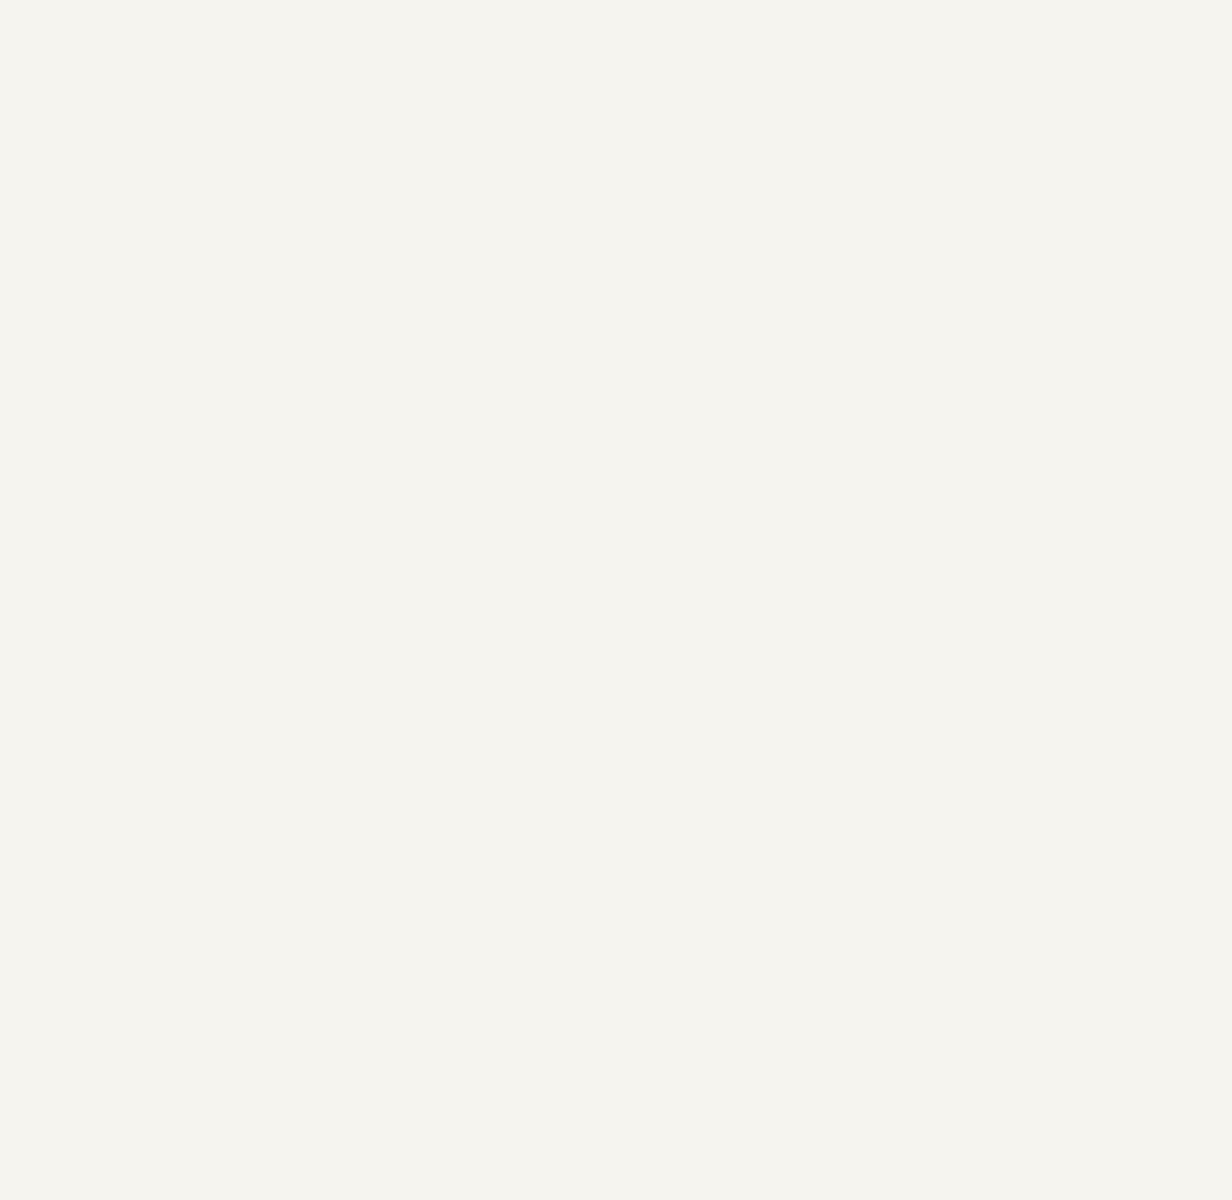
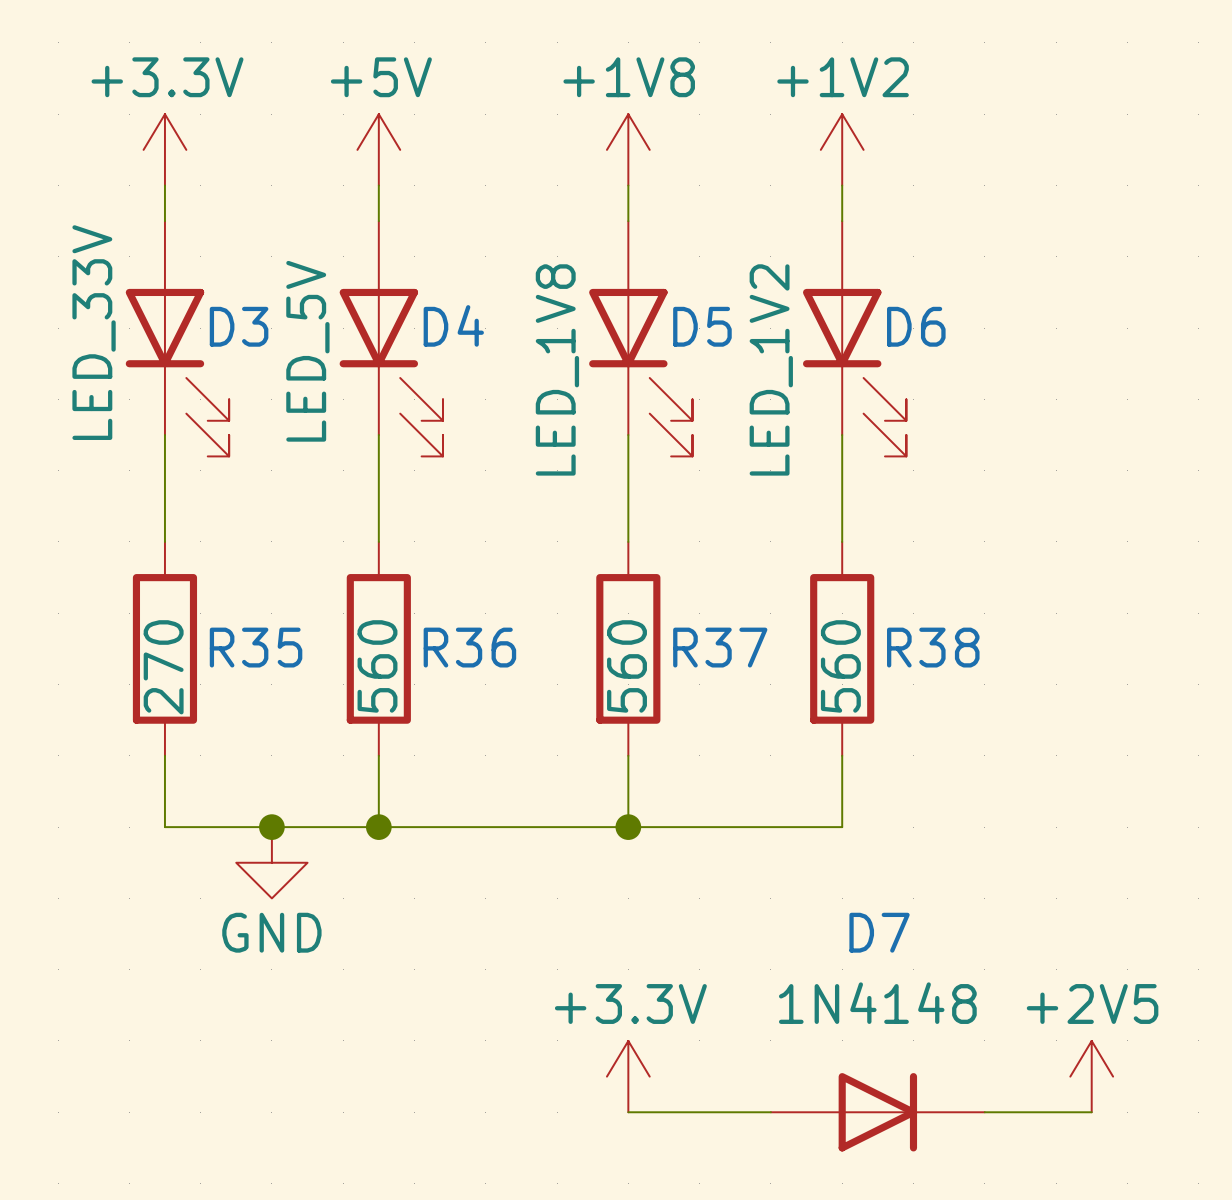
power symbol: none -> +3.3V (164, 149)
power symbol: none -> +5V (378, 149)
power symbol: none -> +1V8 (628, 149)
power symbol: none -> +1V2 (842, 149)
wire: none -> (164, 185) (164, 221)
wire: none -> (378, 185) (378, 221)
wire: none -> (628, 185) (628, 221)
wire: none -> (842, 185) (842, 221)
D3: none -> LED_33V (177, 338)
D4: none -> LED_5V (391, 338)
D5: none -> LED_1V8 (640, 338)
D6: none -> LED_1V2 (854, 338)
wire: none -> (164, 435) (164, 541)
wire: none -> (378, 435) (378, 541)
wire: none -> (628, 435) (628, 541)
wire: none -> (842, 435) (842, 541)
R35: none -> 270 (164, 648)
R36: none -> 560 (378, 648)
R37: none -> 560 (628, 648)
R38: none -> 560 (842, 648)
wire: none -> (164, 755) (164, 827) (842, 827) (842, 755)
wire: none -> (378, 755) (378, 827)
wire: none -> (628, 755) (628, 827)
junction: none -> (271, 827)
junction: none -> (378, 827)
junction: none -> (628, 827)
power symbol: none -> GND (271, 862)
power symbol: none -> +3.3V (628, 1076)
power symbol: none -> +2V5 (1091, 1076)
wire: none -> (628, 1112) (770, 1112)
D7: none -> 1N4148 (877, 1112)
wire: none -> (984, 1112) (1091, 1112)

